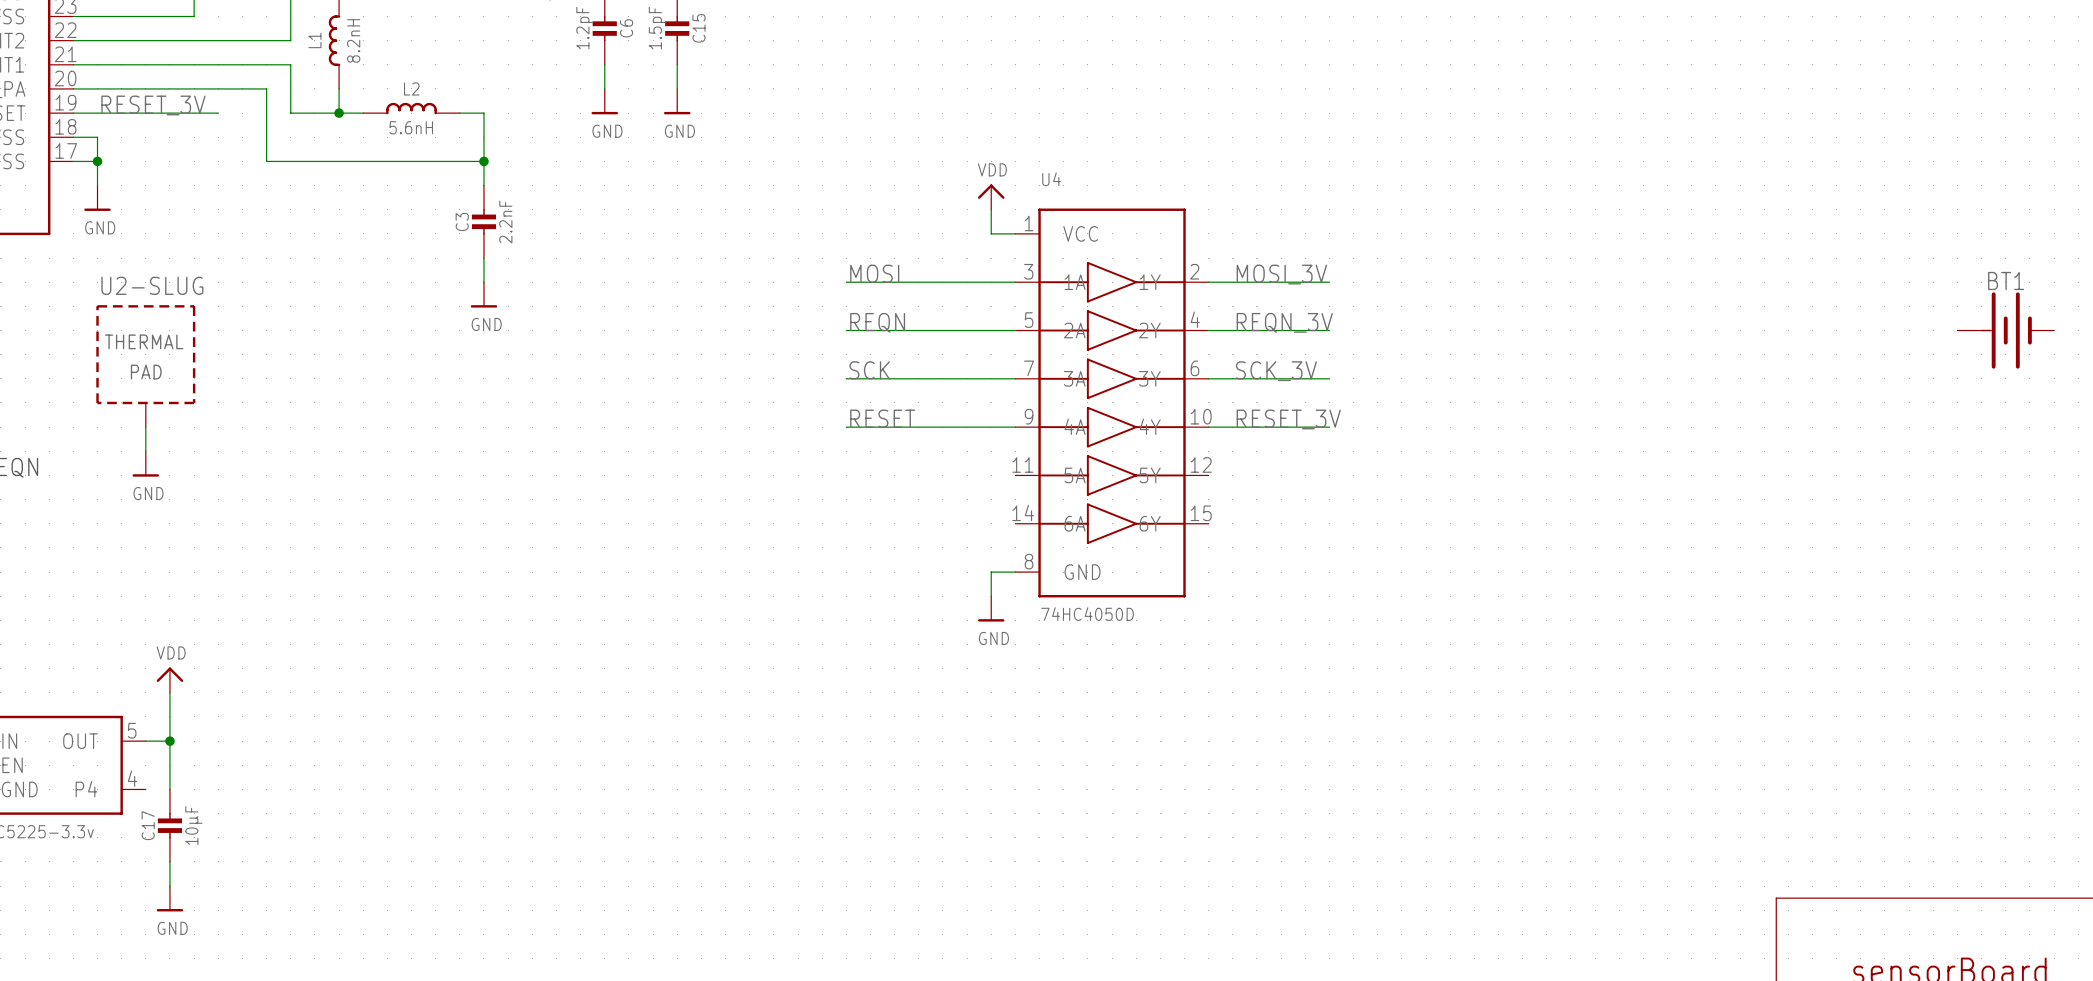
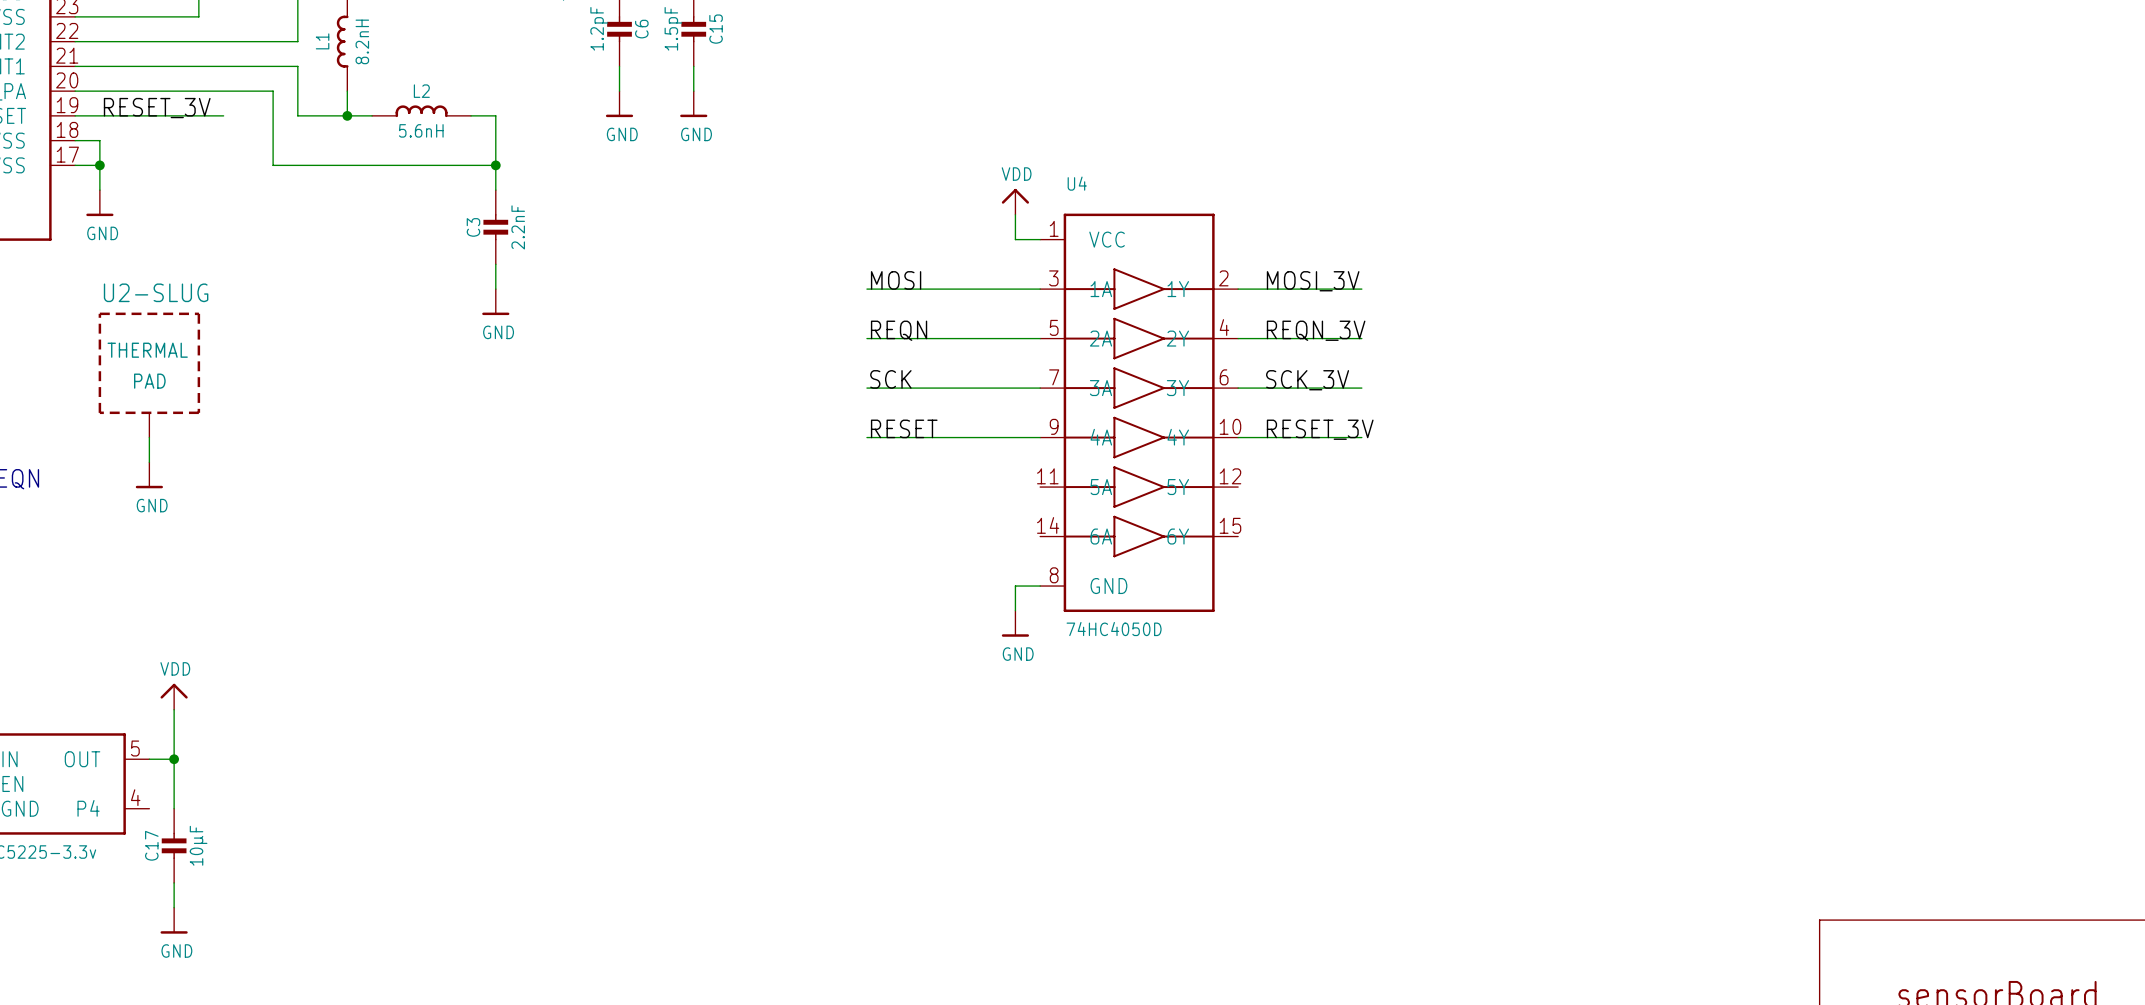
BT1: (2005, 330) -> none

